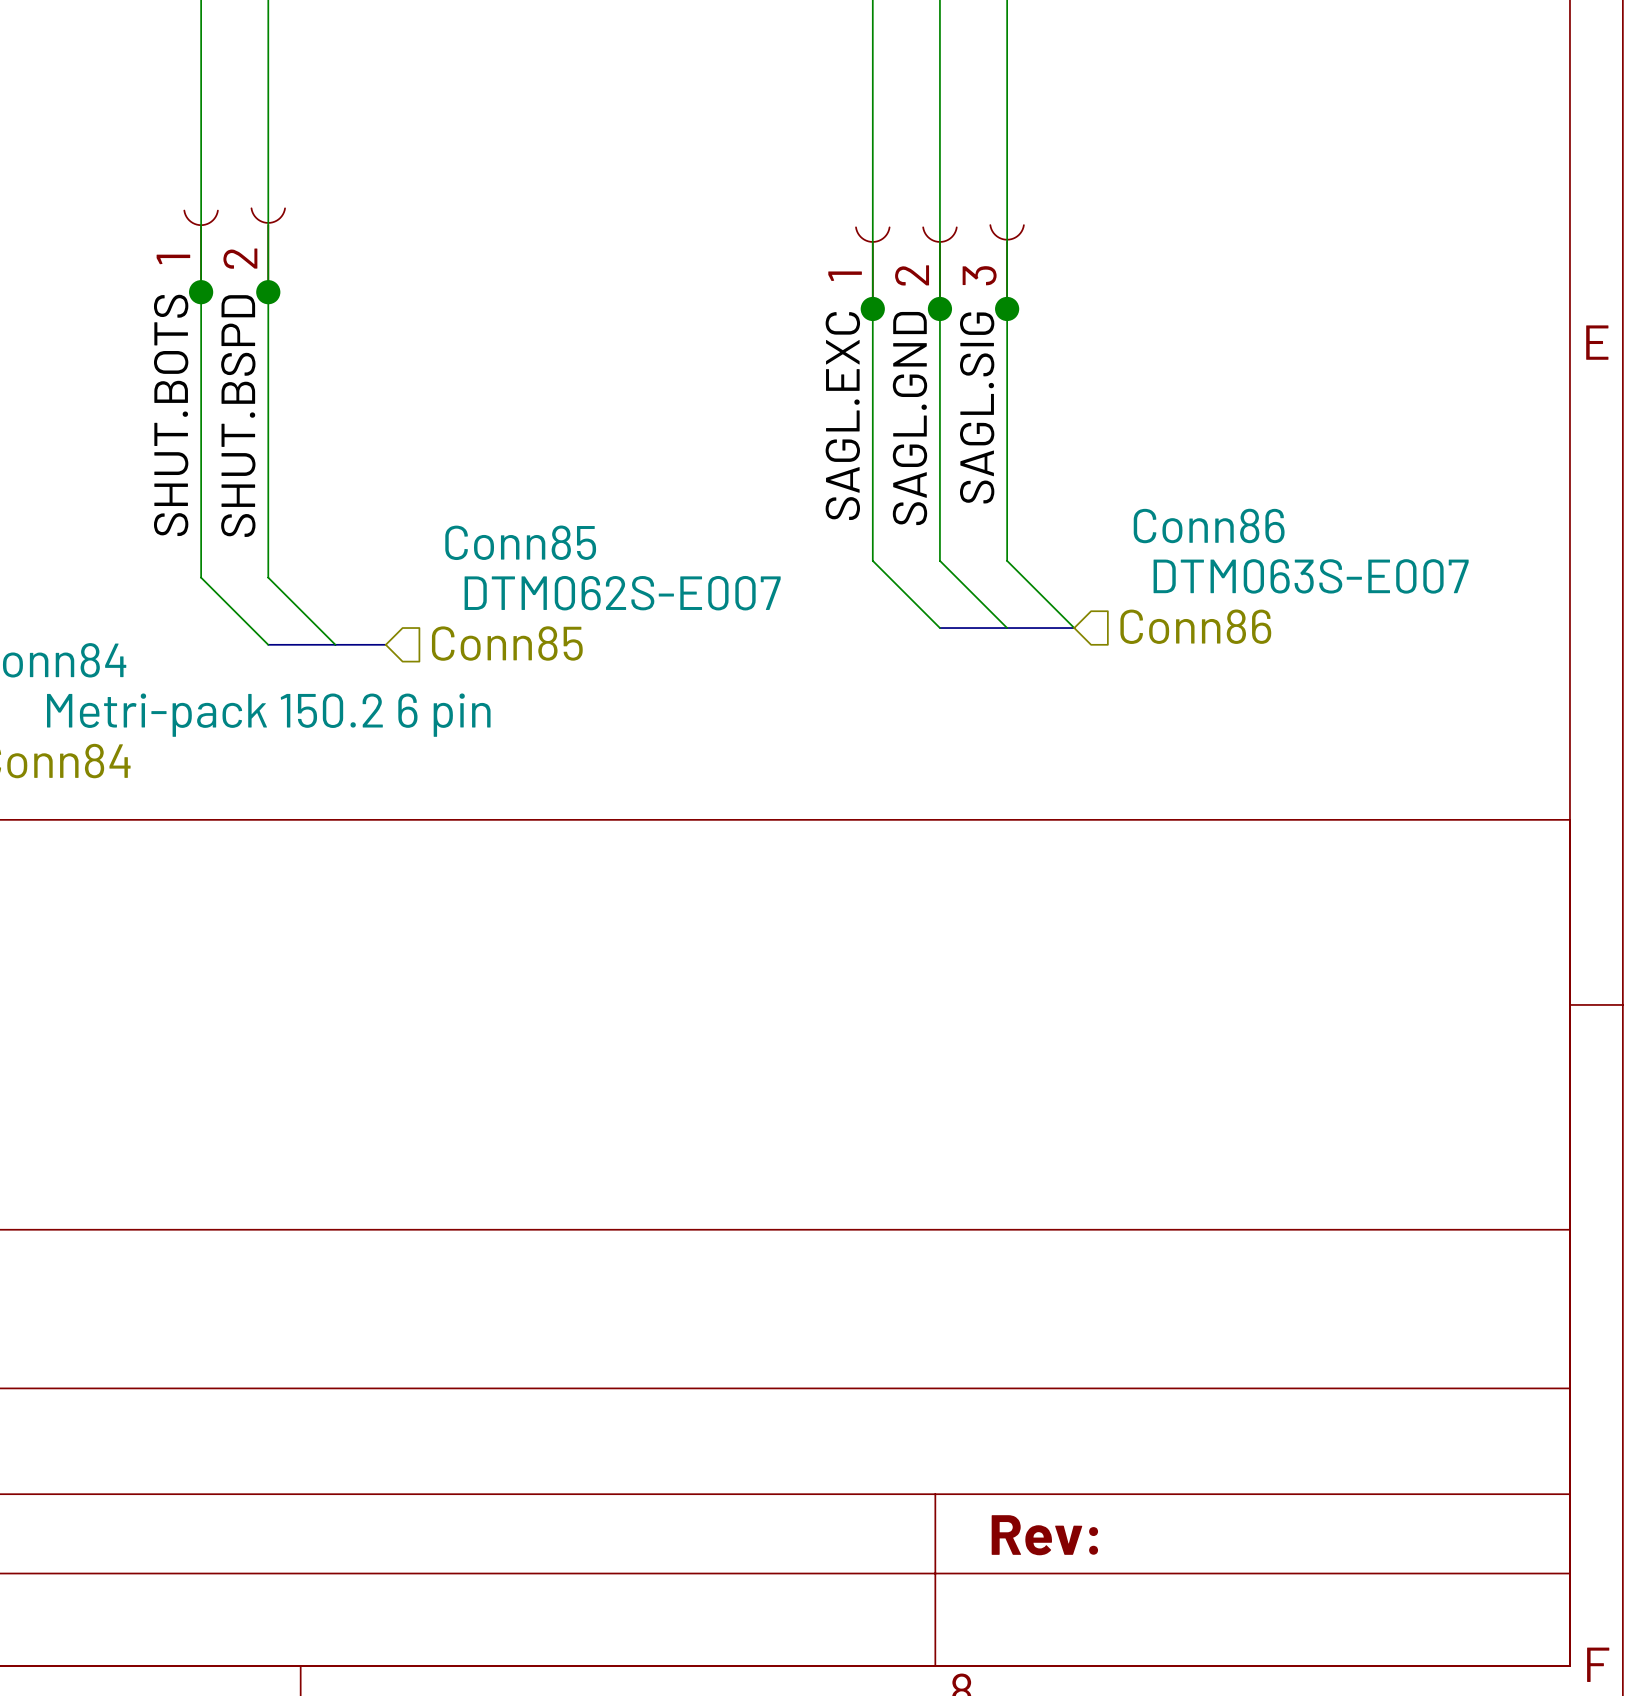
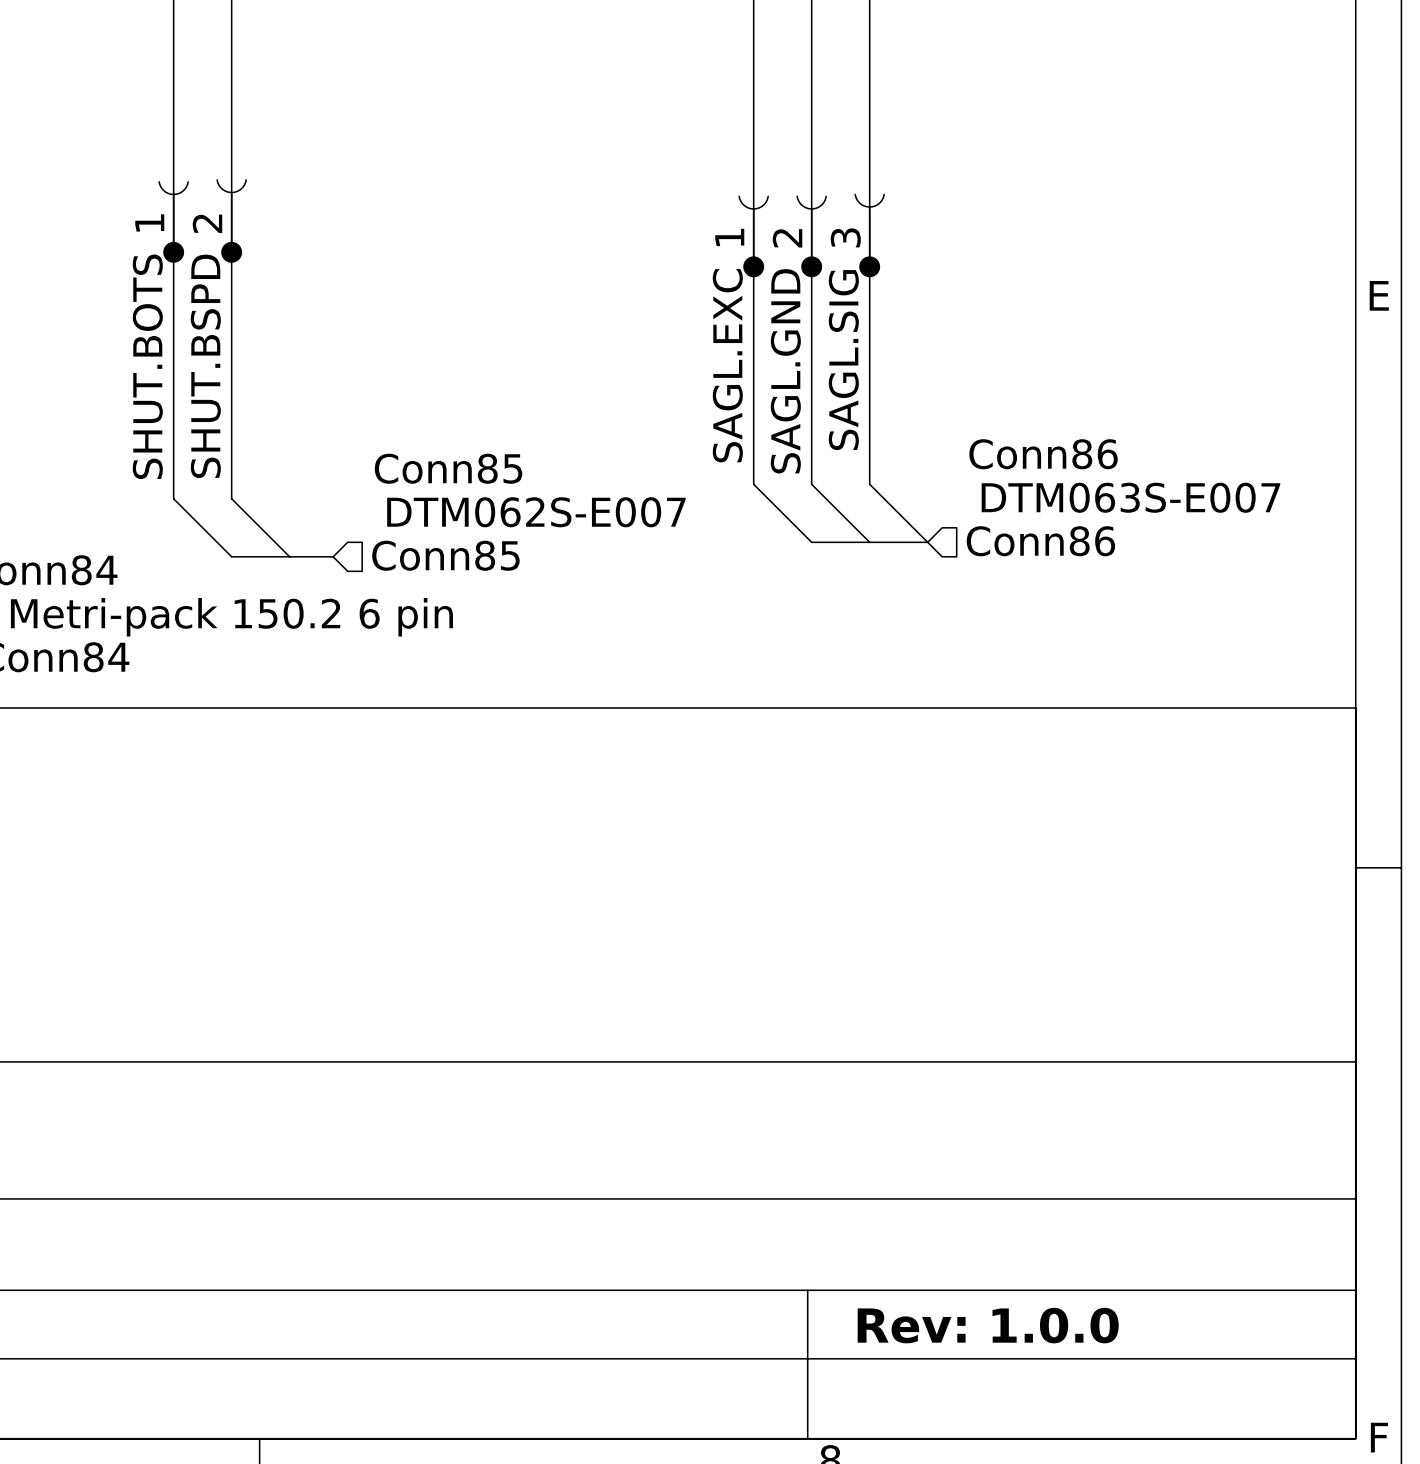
title block: Rev: (1044, 1535) -> Rev: 1.0.0 (988, 1325)

